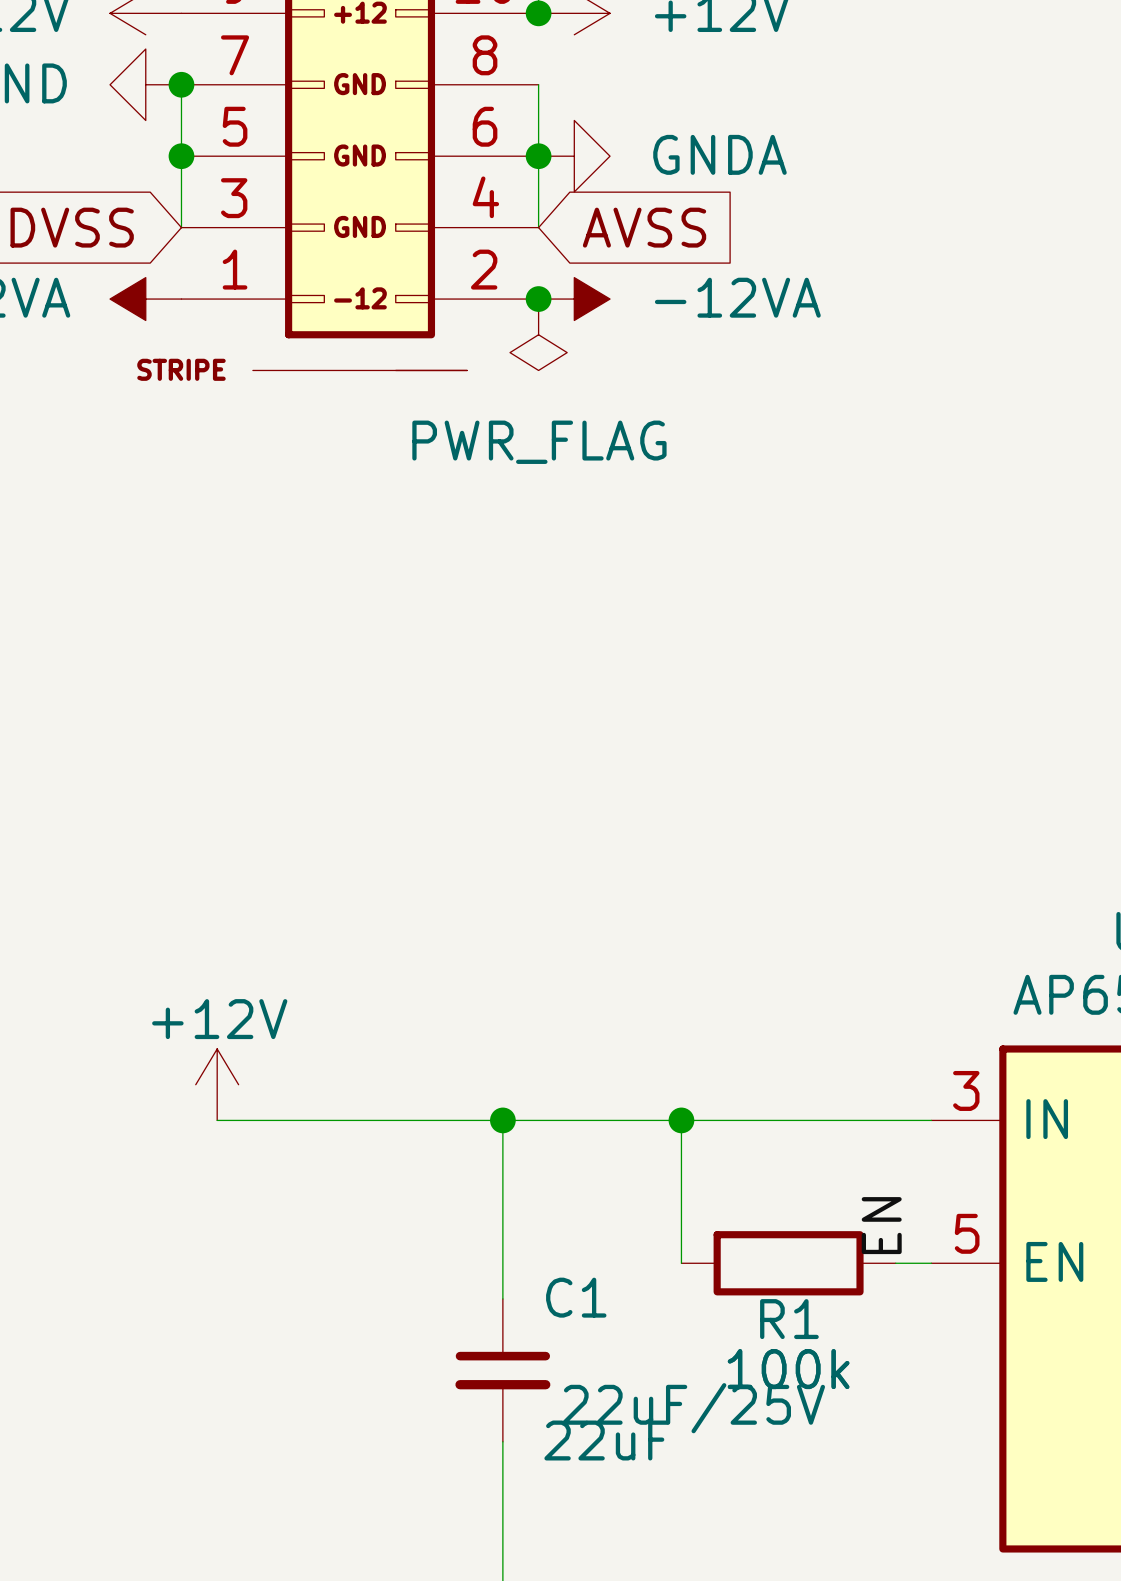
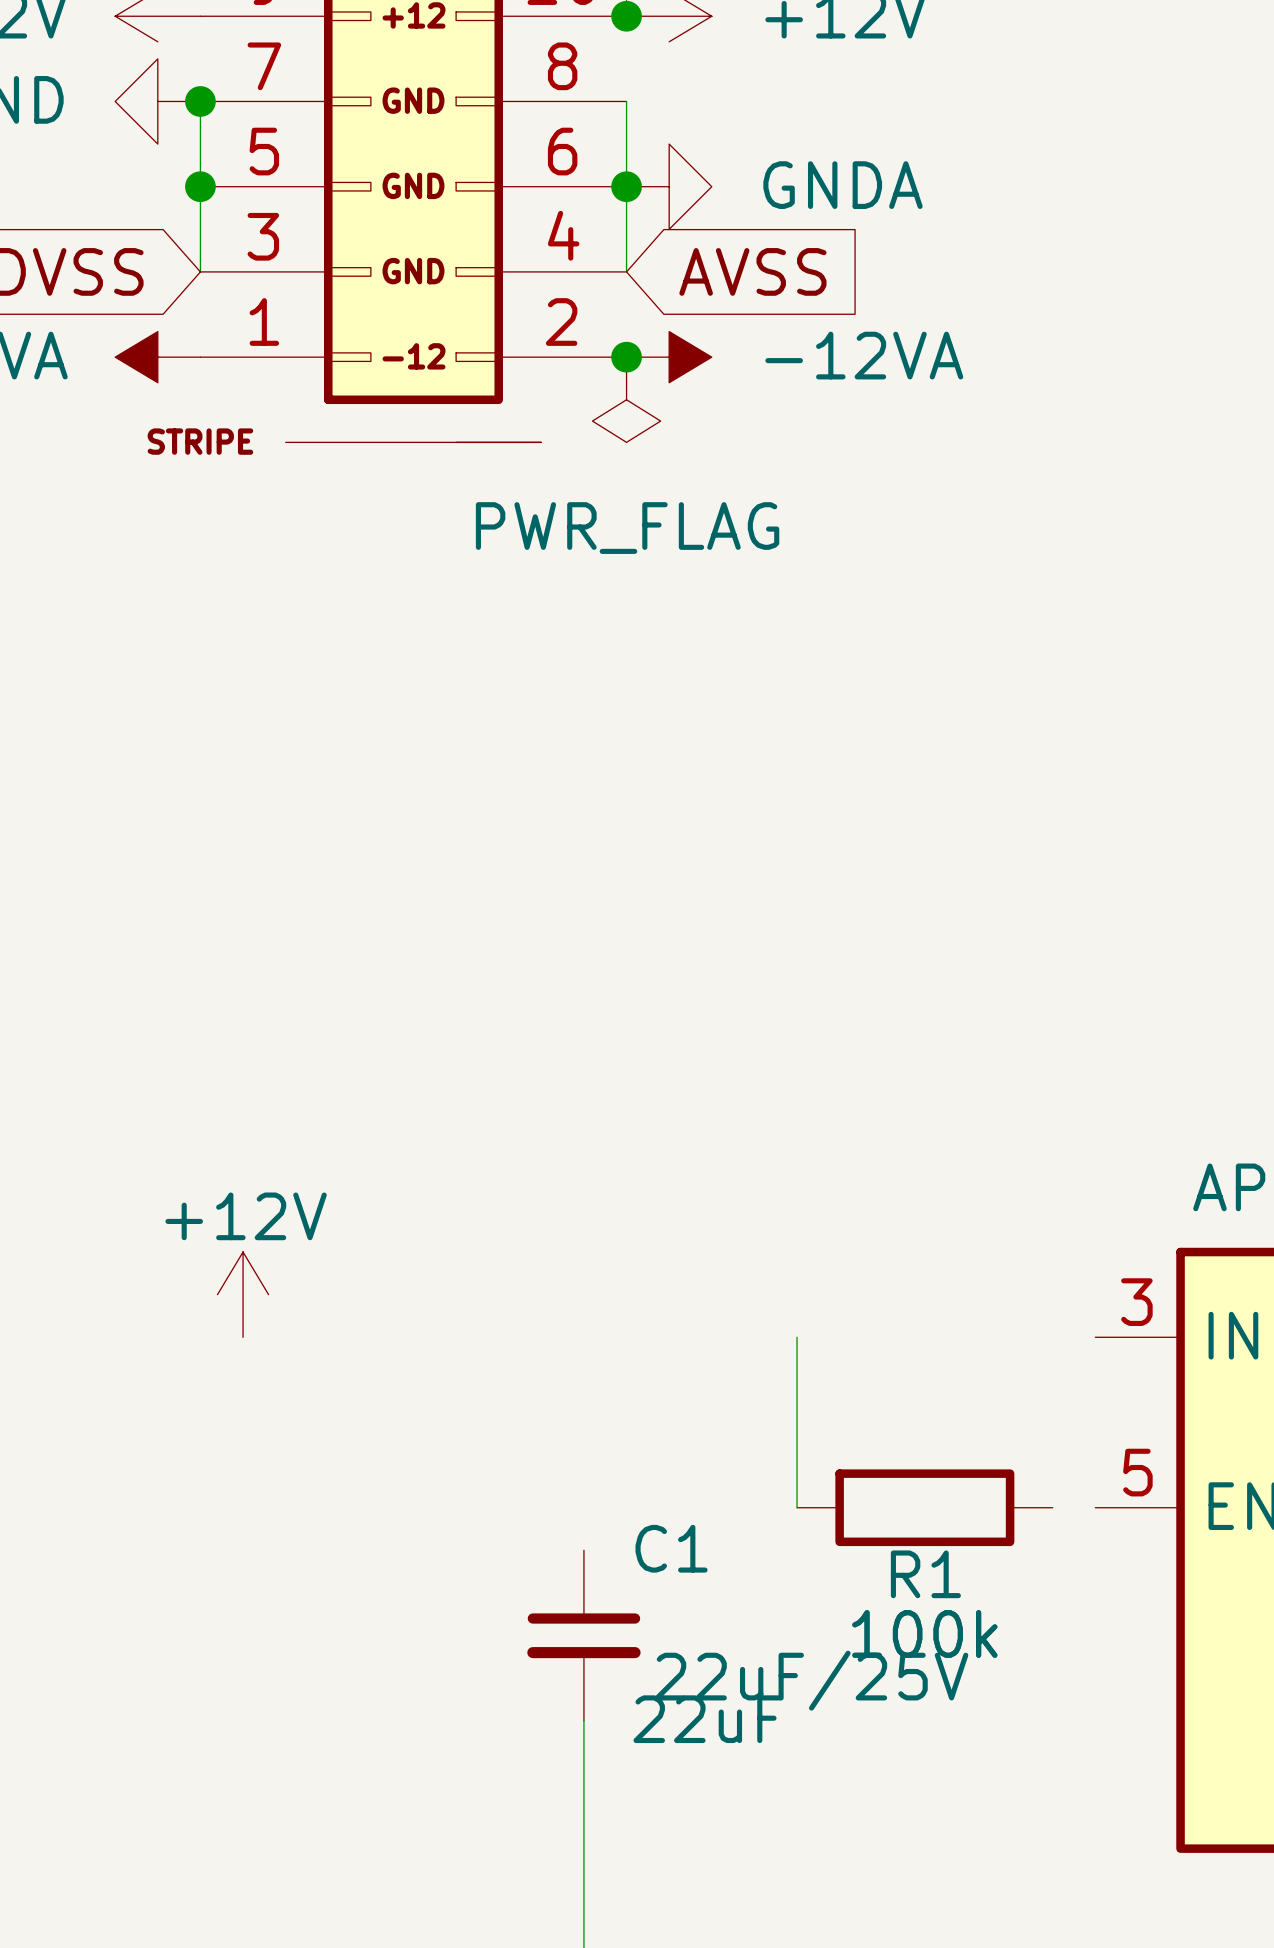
wire: (217, 1120) (931, 1120) -> none
wire: (502, 1120) (502, 1298) -> none
junction: (502, 1120) -> none
junction: (681, 1120) -> none
label: EN (881, 1225) -> none
wire: (895, 1263) (931, 1263) -> none

